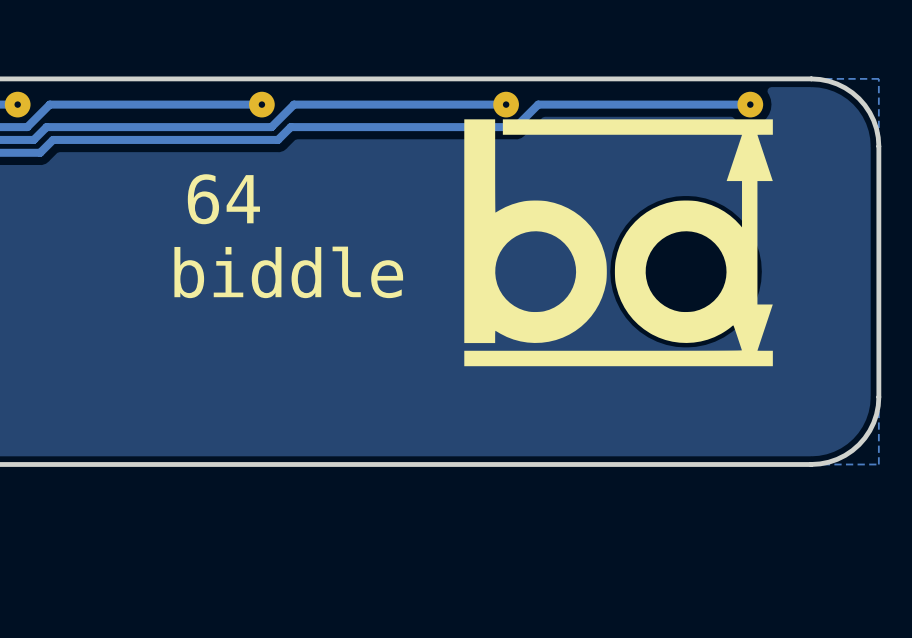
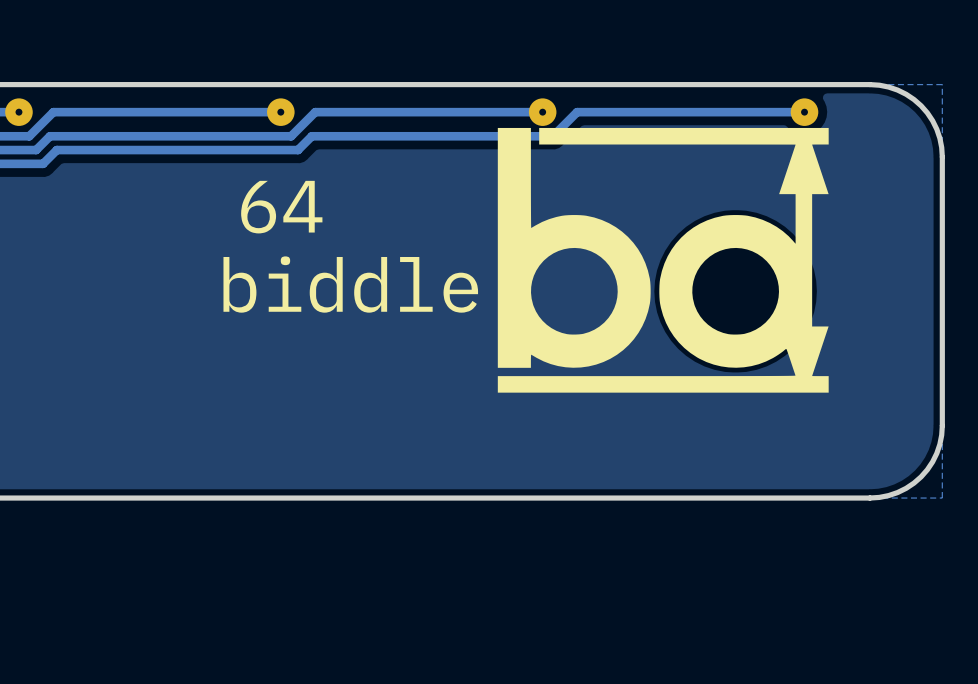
text position: 64 (223, 199) -> 64 (281, 207)
text position: biddle (288, 272) -> biddle (350, 284)

